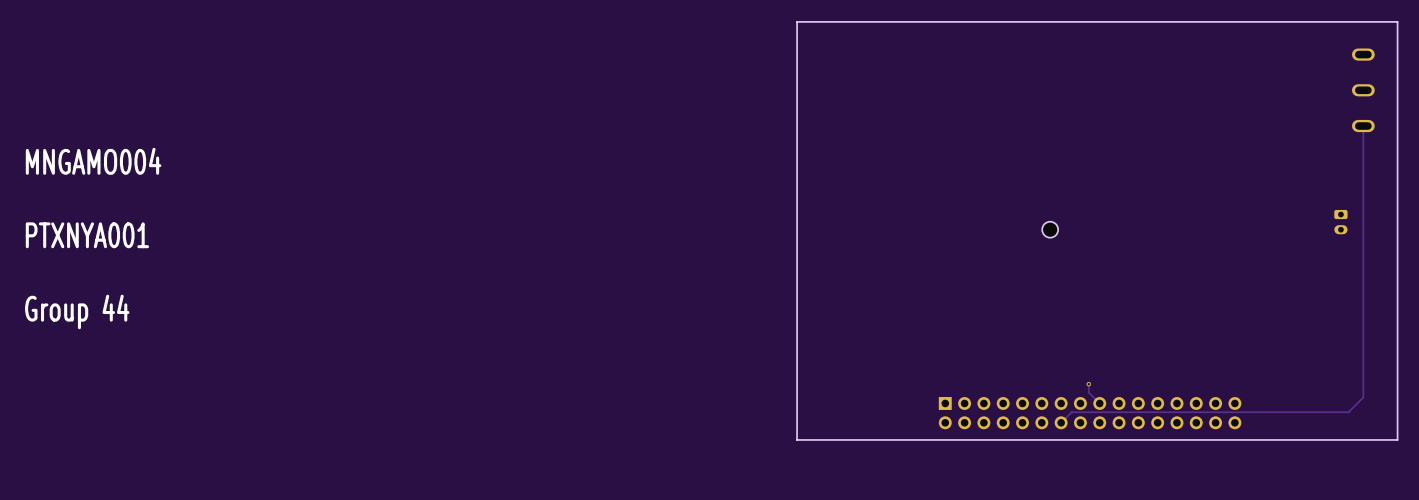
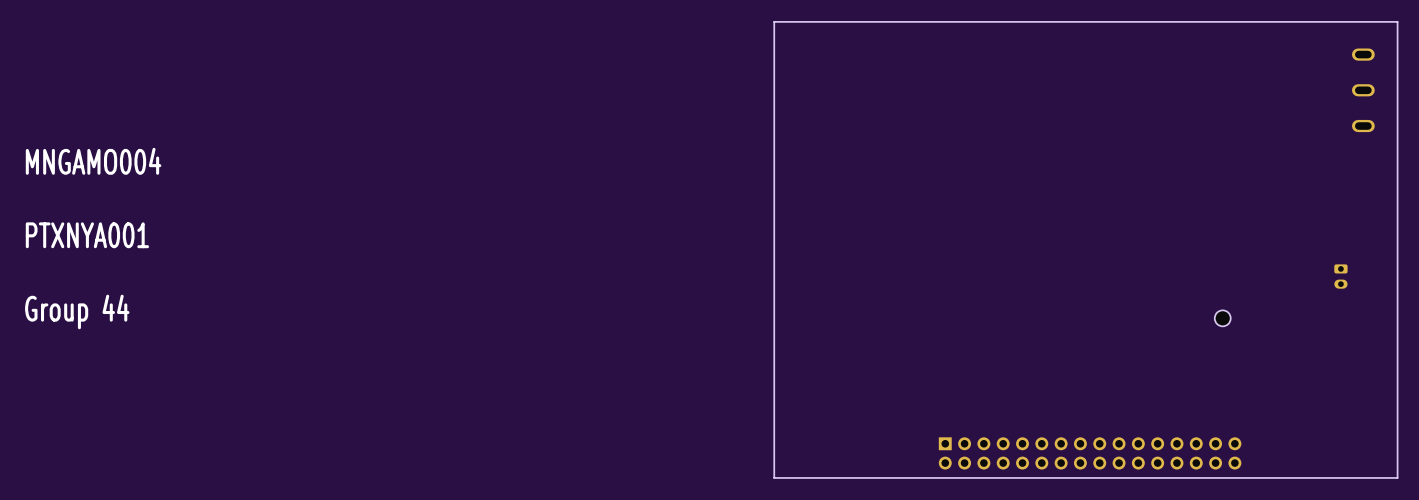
board edge: (797, 21) (797, 439) (1397, 439) -> (797, 21) (774, 21) (774, 477) (1397, 477) (1397, 439)
track: (1363, 126) (1363, 397) (1348, 412) (1071, 412) (1061, 422) -> none
part position: (1340, 222) -> (1340, 276)
part: (1050, 229) -> none
part: none -> (1222, 318)
track: (1088, 384) (1088, 392) (1099, 403) -> none
via: (1088, 384) -> none
part position: (1090, 413) -> (1090, 453)

